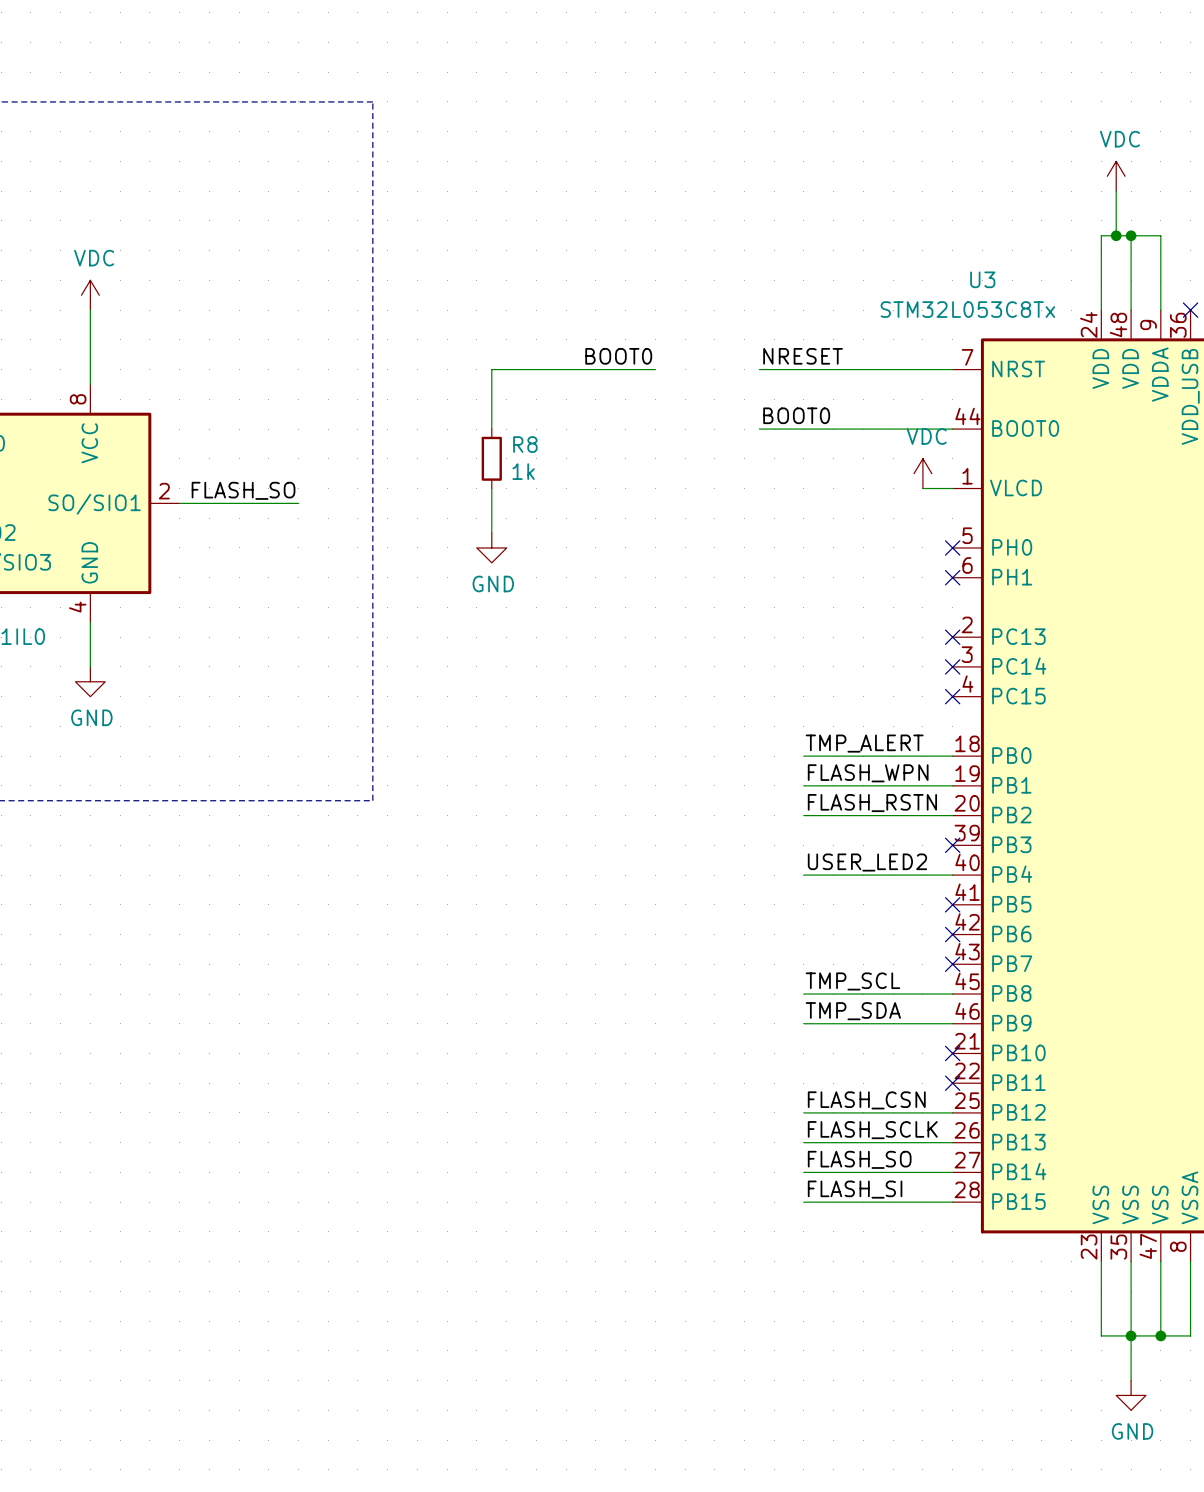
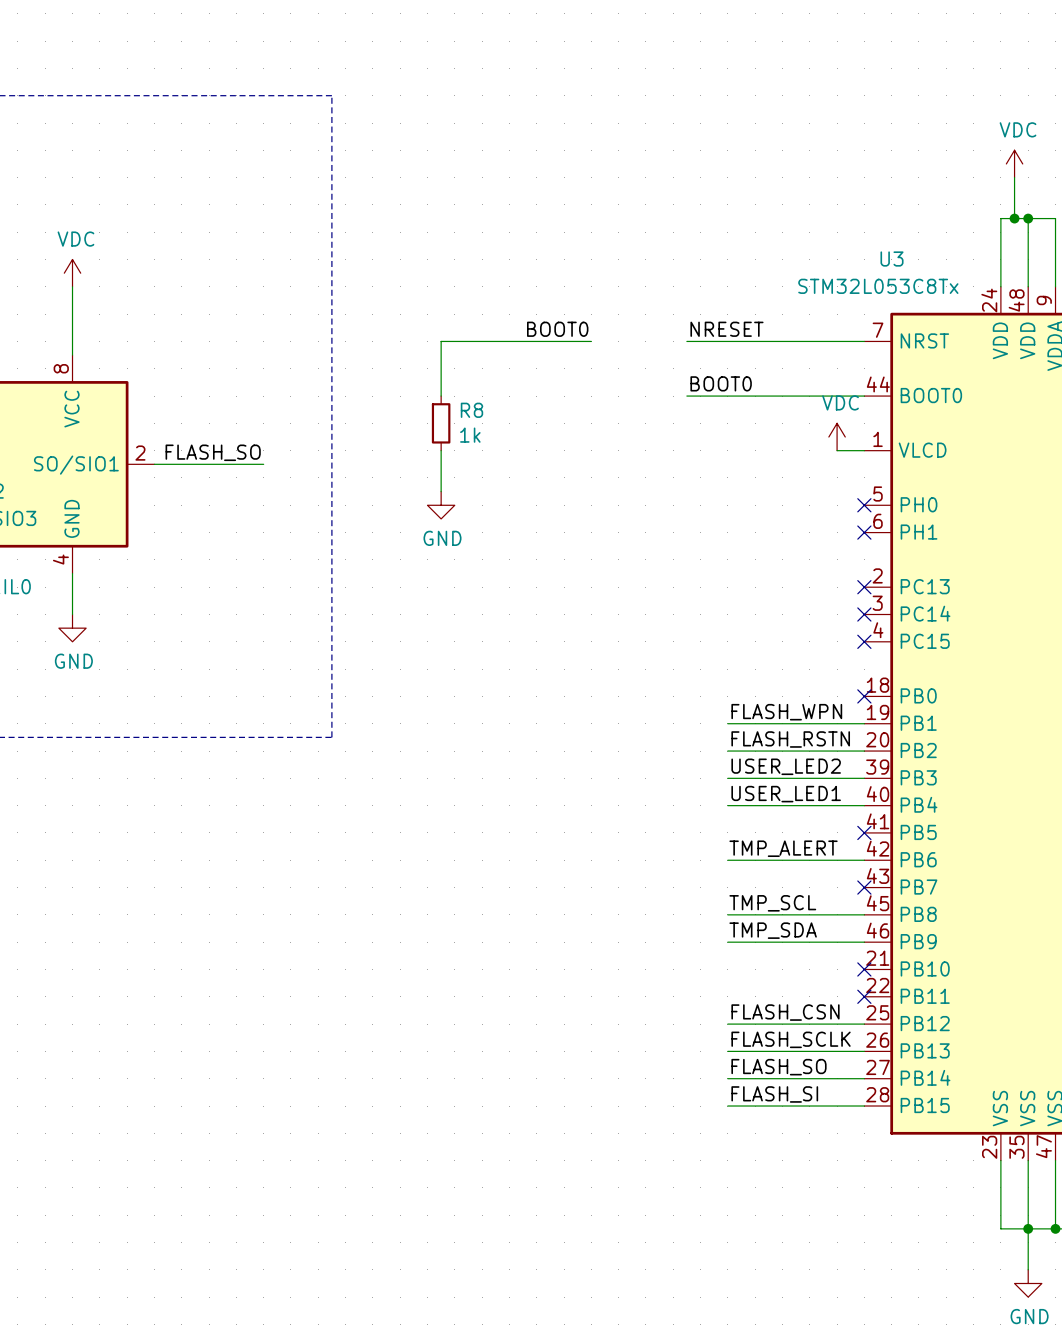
label position: TMP_ALERT (864, 743) -> TMP_ALERT (783, 848)
wire: (803, 756) (952, 756) -> (727, 778) (864, 778)
no-connect mark: none -> (864, 696)
label: none -> USER_LED2 (786, 766)
no-connect mark: (952, 845) -> none
label: USER_LED2 (867, 862) -> USER_LED1 (786, 794)
wire: none -> (727, 860) (864, 860)
no-connect mark: (952, 934) -> none

